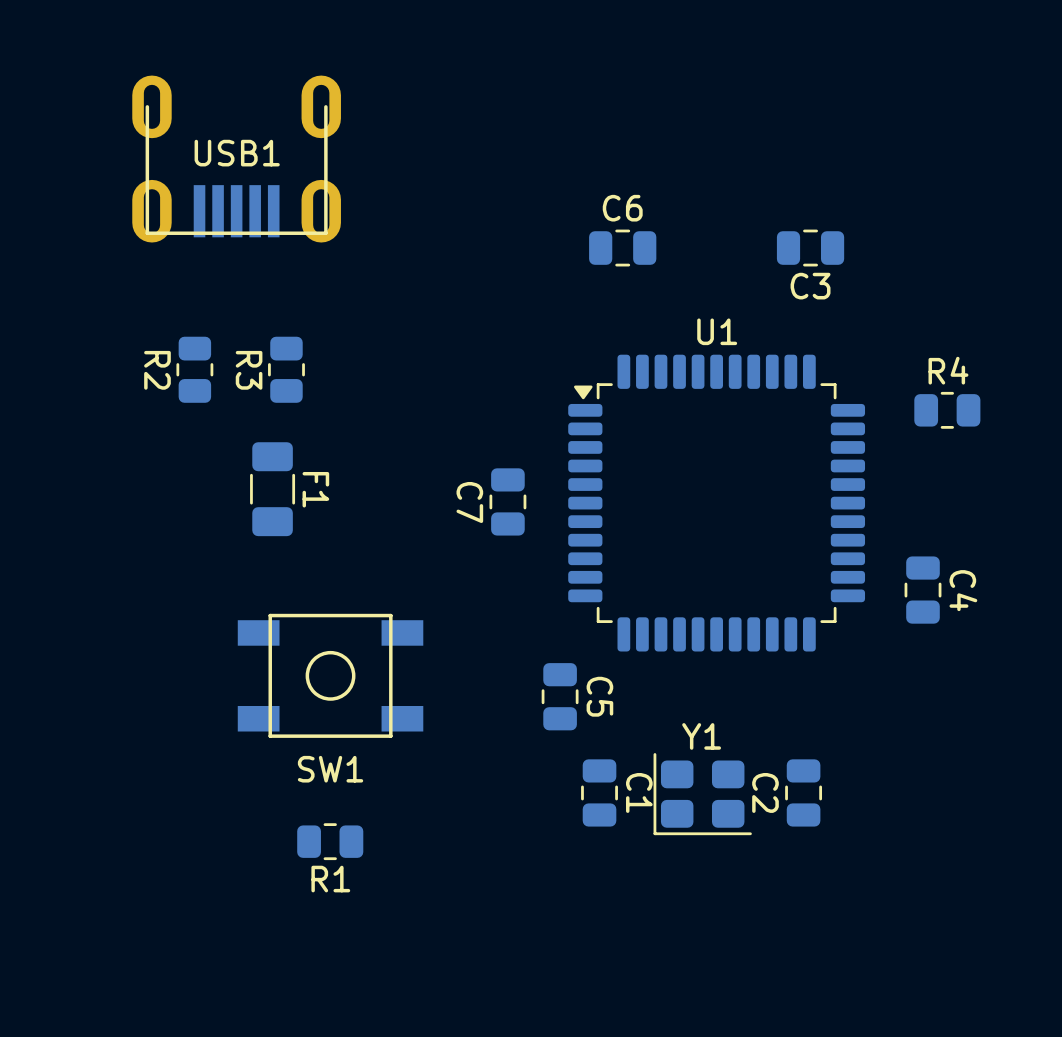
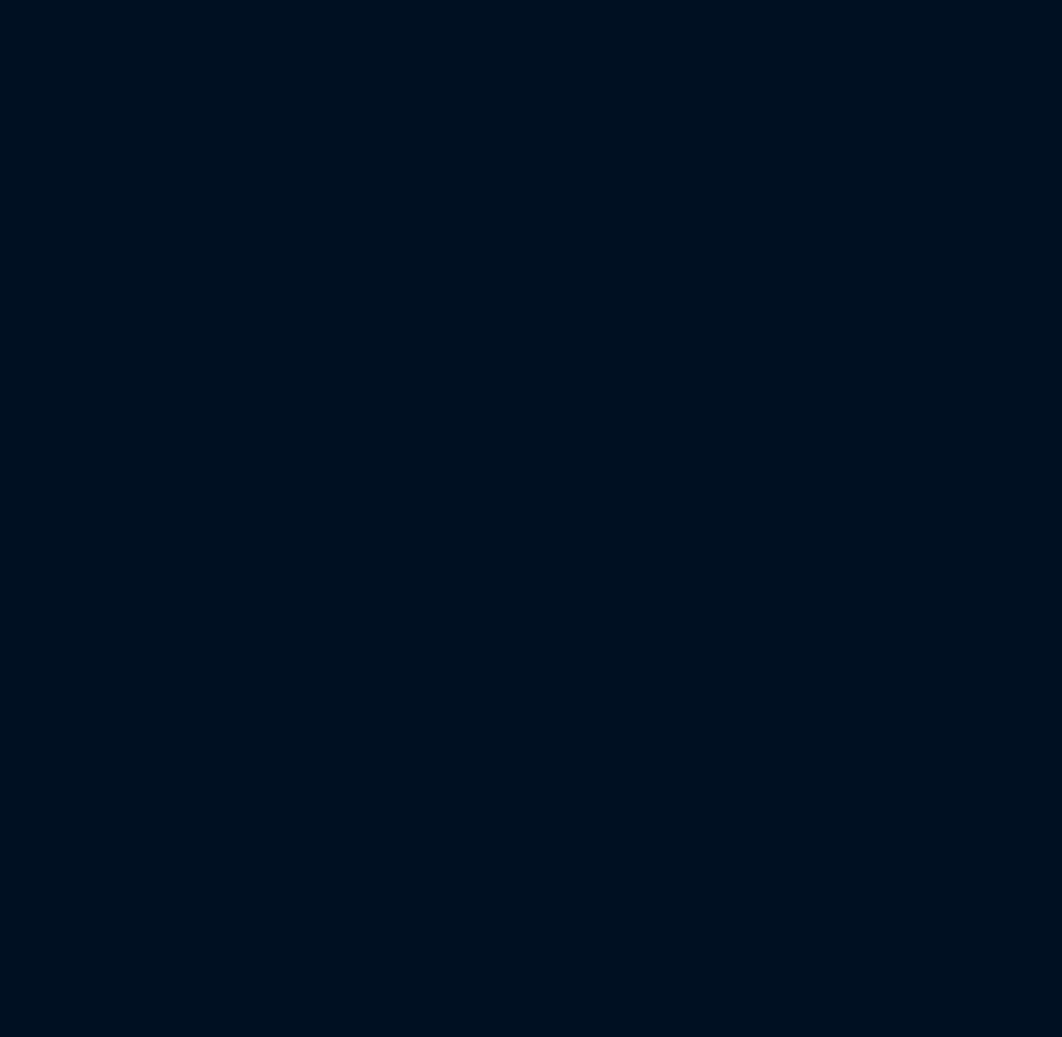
USB1: (236, 159) -> none
C6: (622, 248) -> none
C3: (810, 248) -> none
R2: (194, 369) -> none
R3: (286, 369) -> none
R4: (947, 410) -> none
F1: (272, 489) -> none
C7: (507, 501) -> none
U1: (716, 503) -> none
C4: (923, 590) -> none
SW1: (330, 675) -> none
C5: (560, 696) -> none
C1: (599, 792) -> none
C2: (803, 792) -> none
Y1: (702, 794) -> none
R1: (330, 841) -> none

